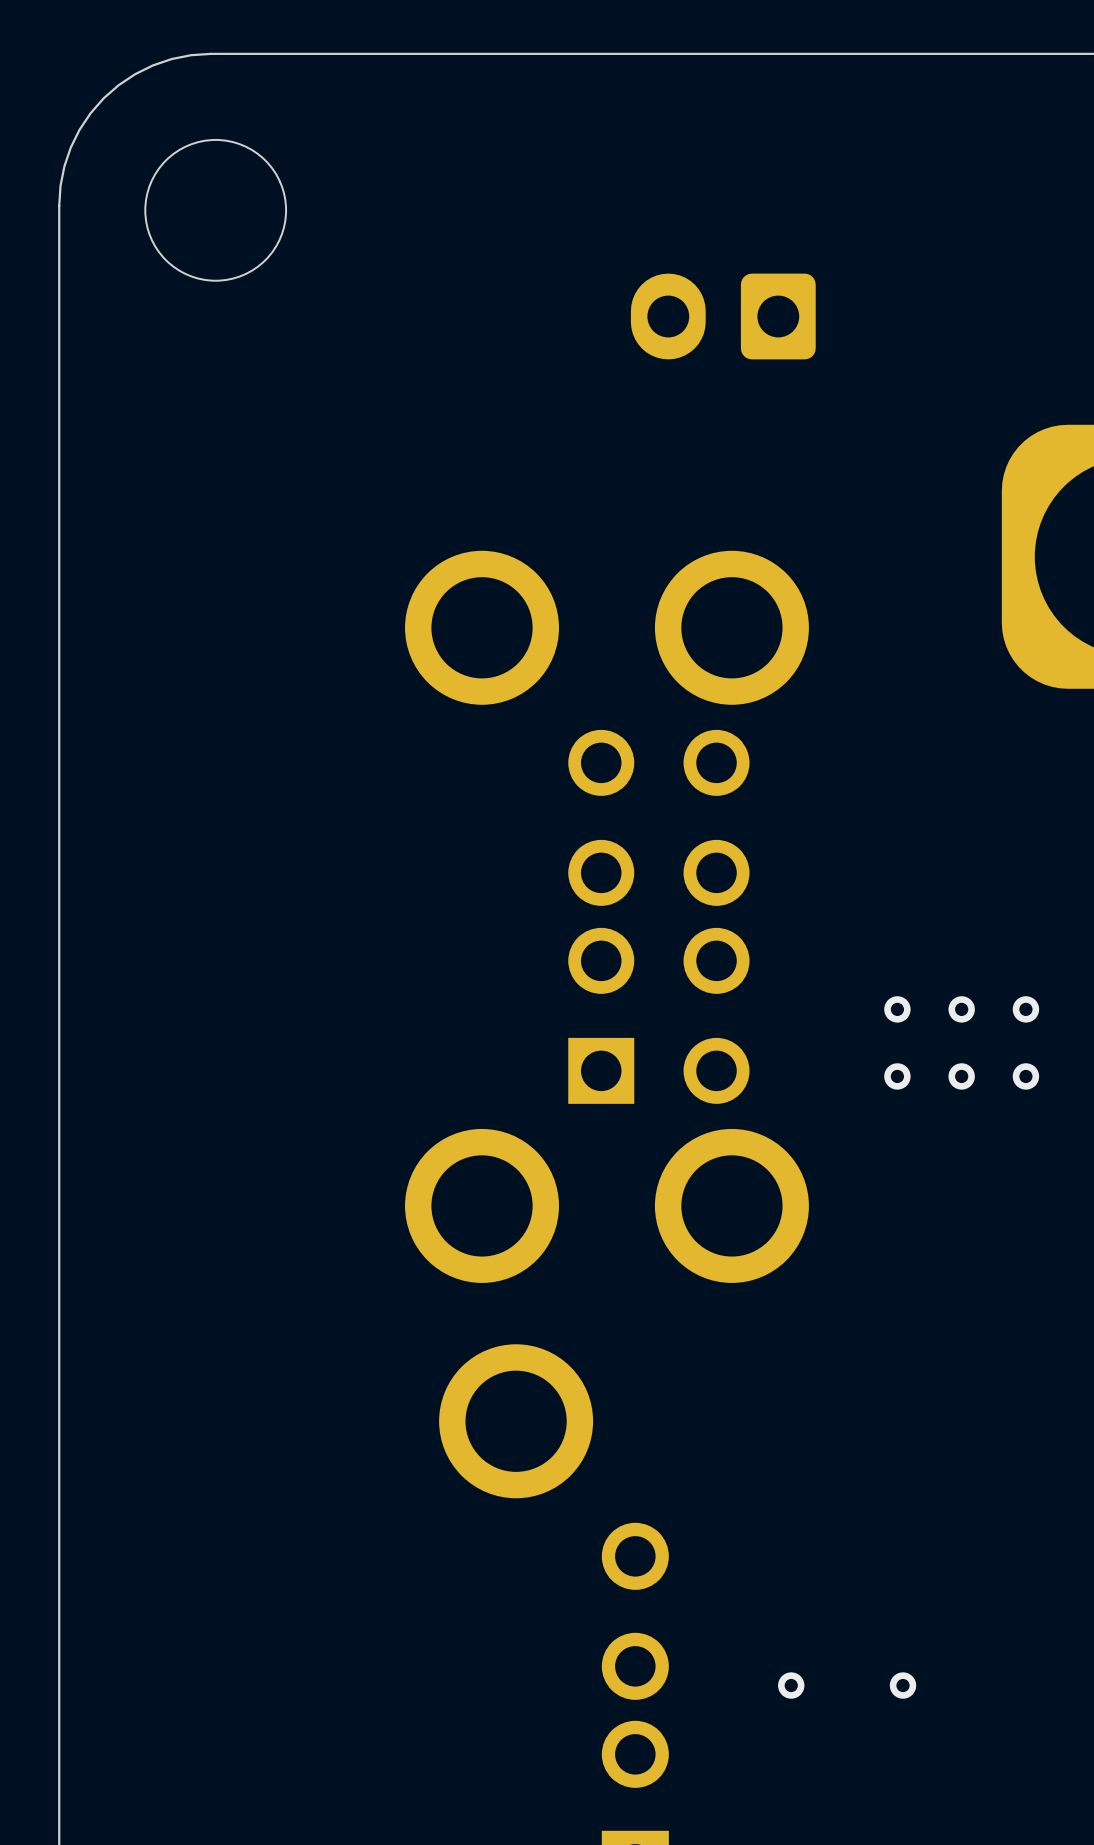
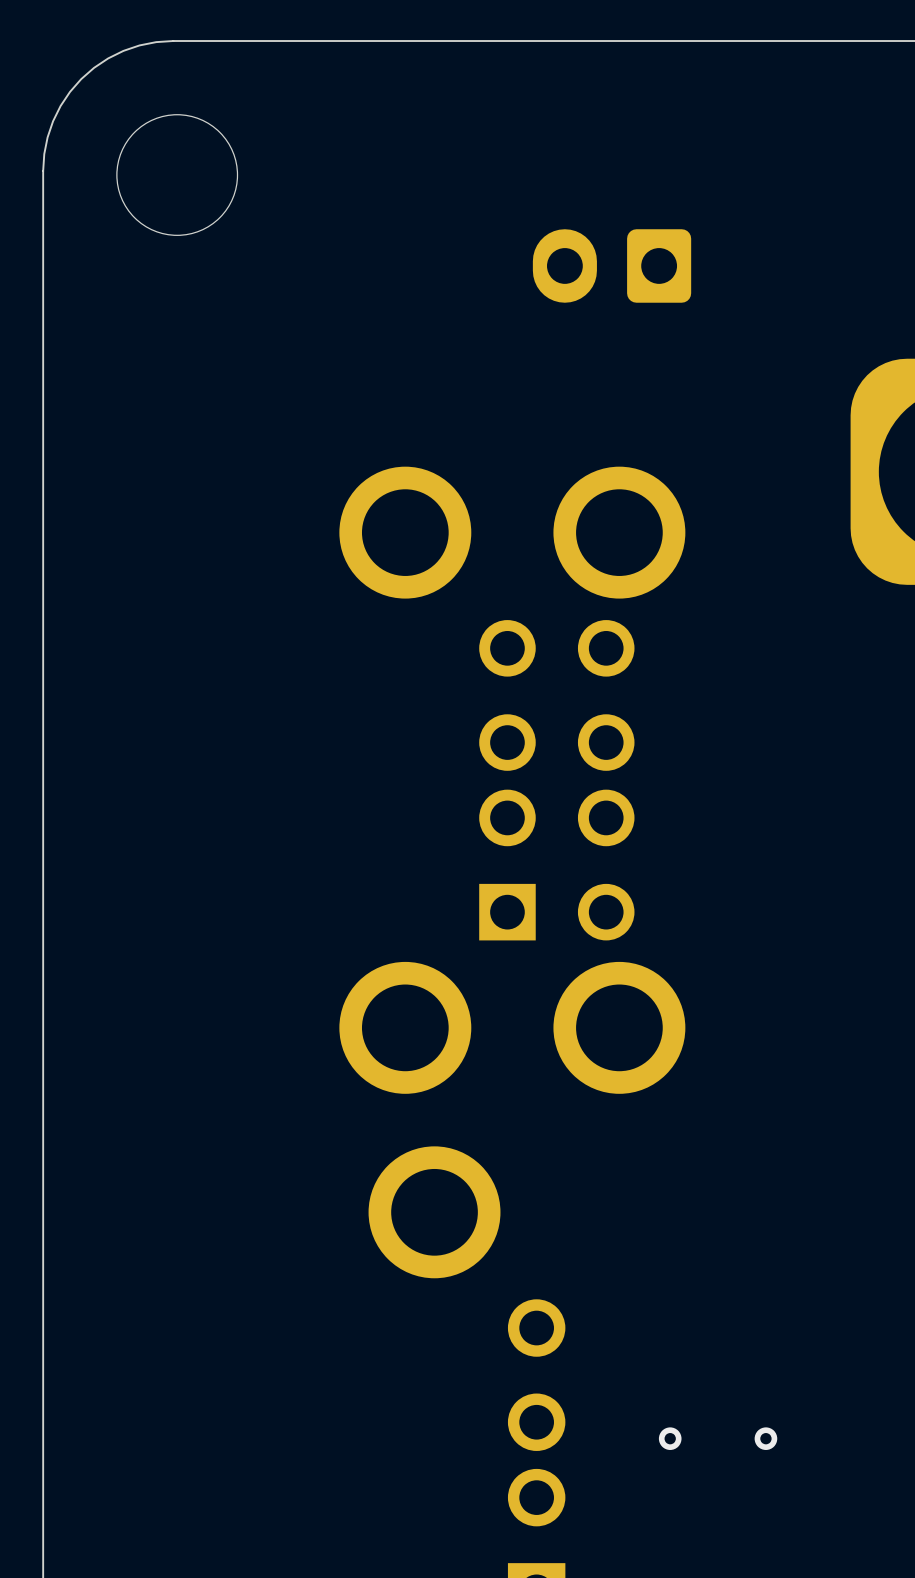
via: (897, 1009) -> none
via: (961, 1009) -> none
via: (1025, 1009) -> none
via: (897, 1076) -> none
via: (961, 1076) -> none
via: (1025, 1076) -> none

